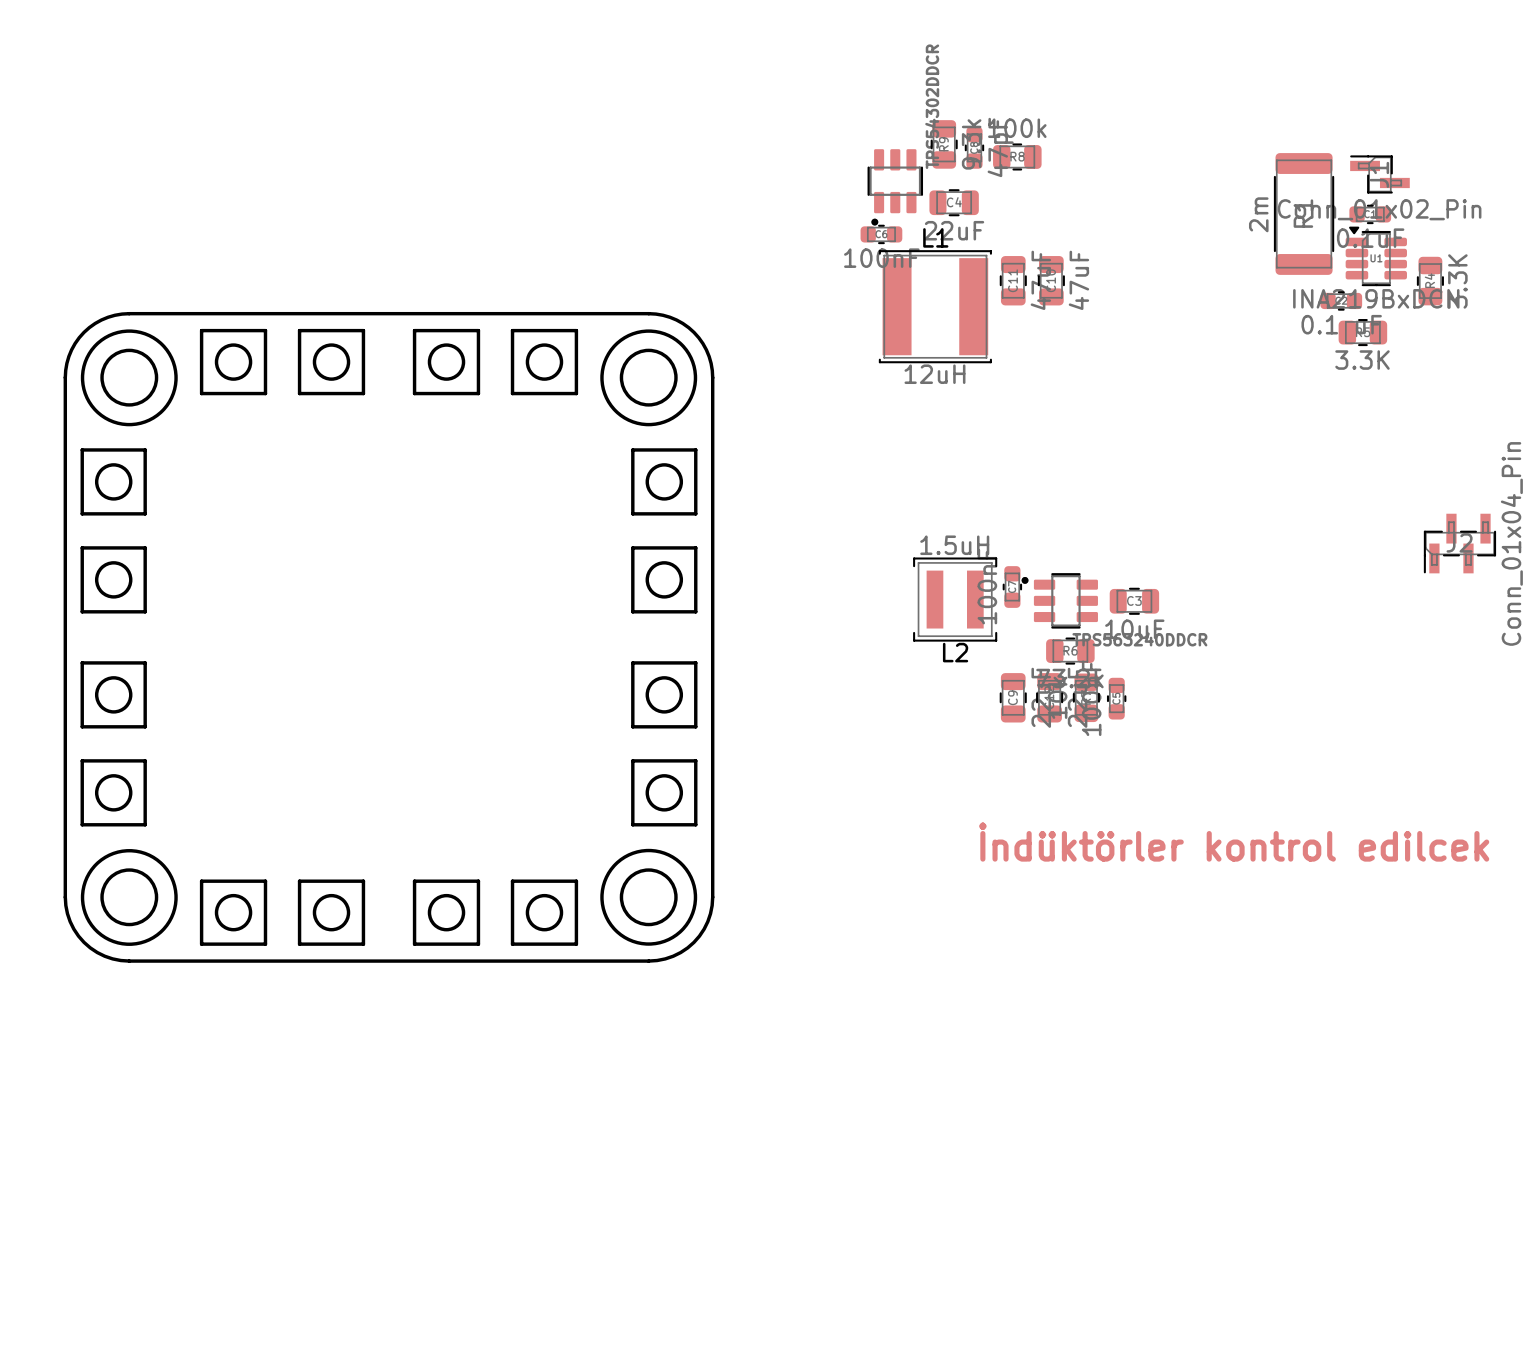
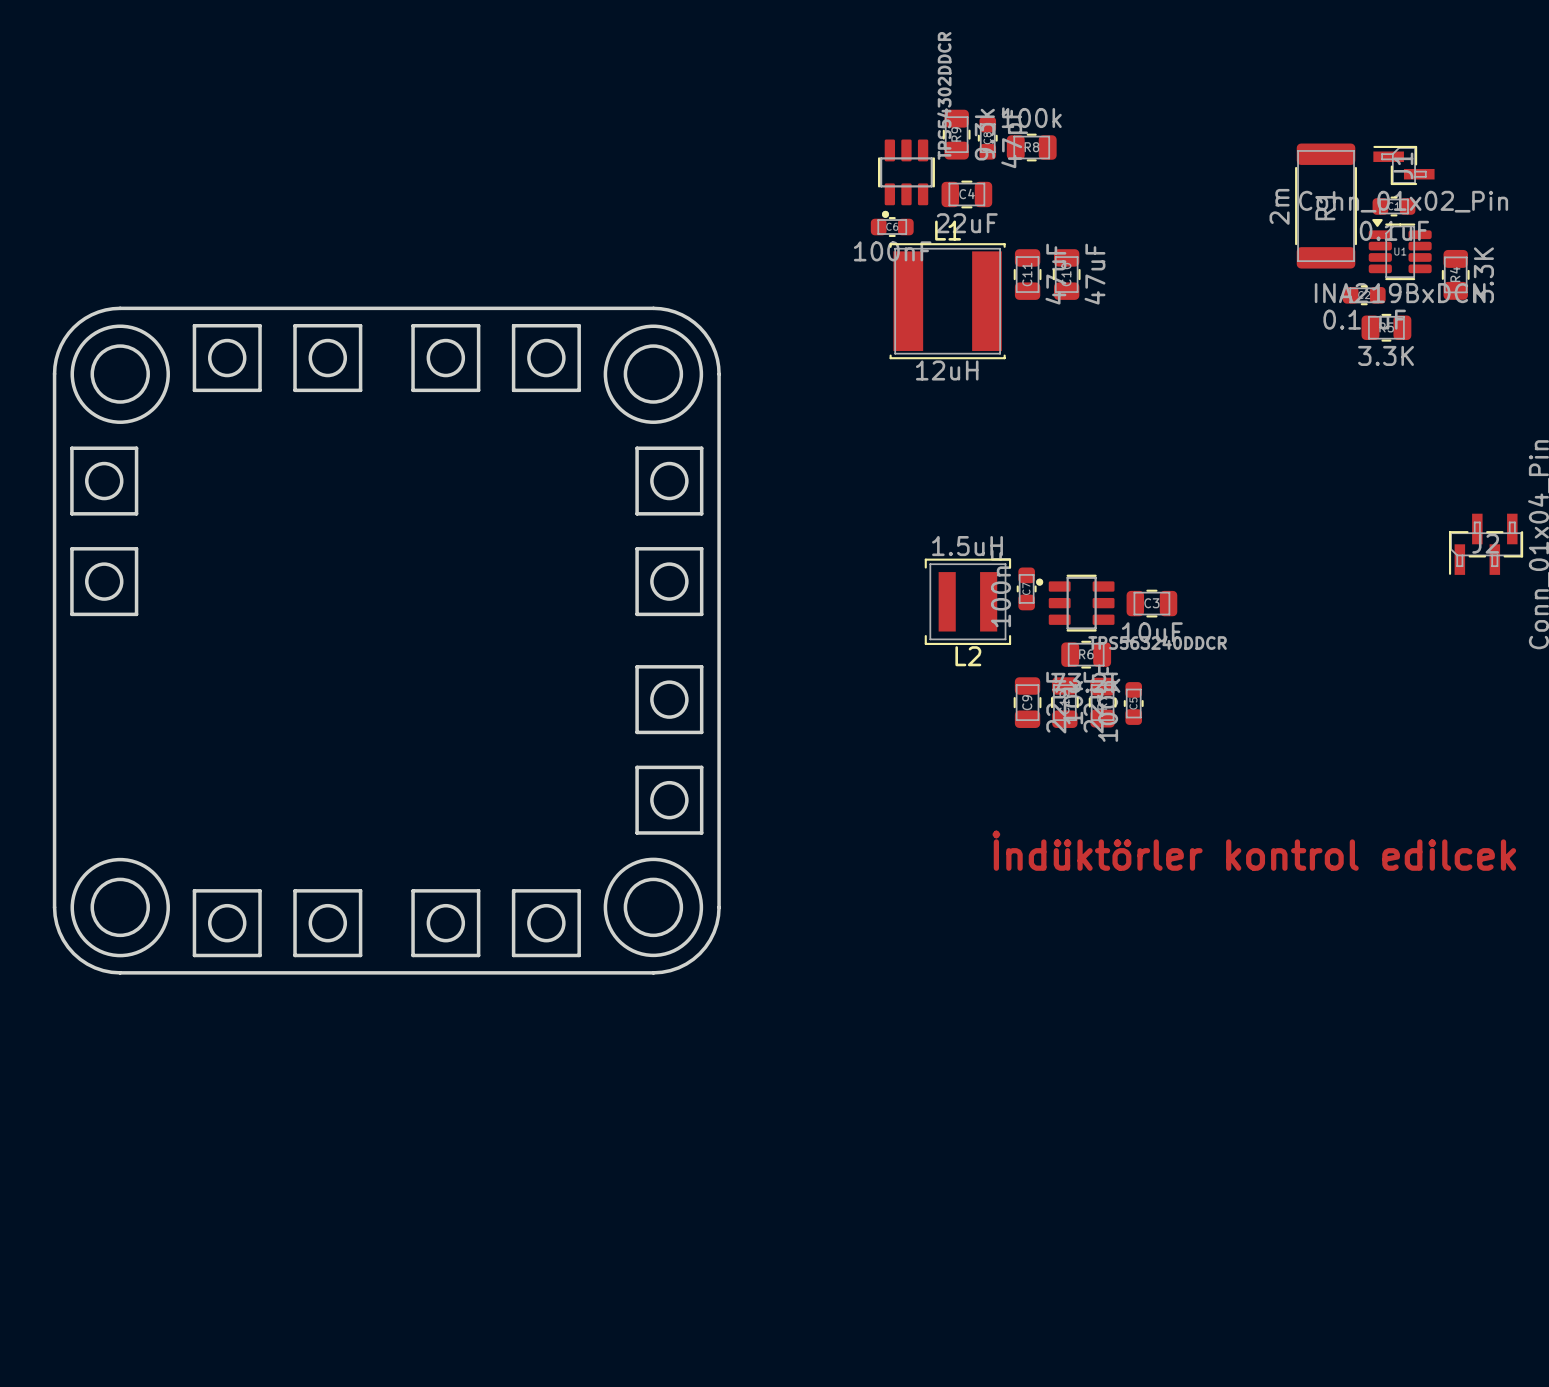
board edge: (82, 662) (82, 726) (145, 726) (145, 662) (82, 662) -> none
round board edge: [94, 676, 133, 714] -> none
board edge: (82, 760) (82, 824) (145, 824) (145, 760) (82, 760) -> none
round board edge: [94, 774, 133, 812] -> none

